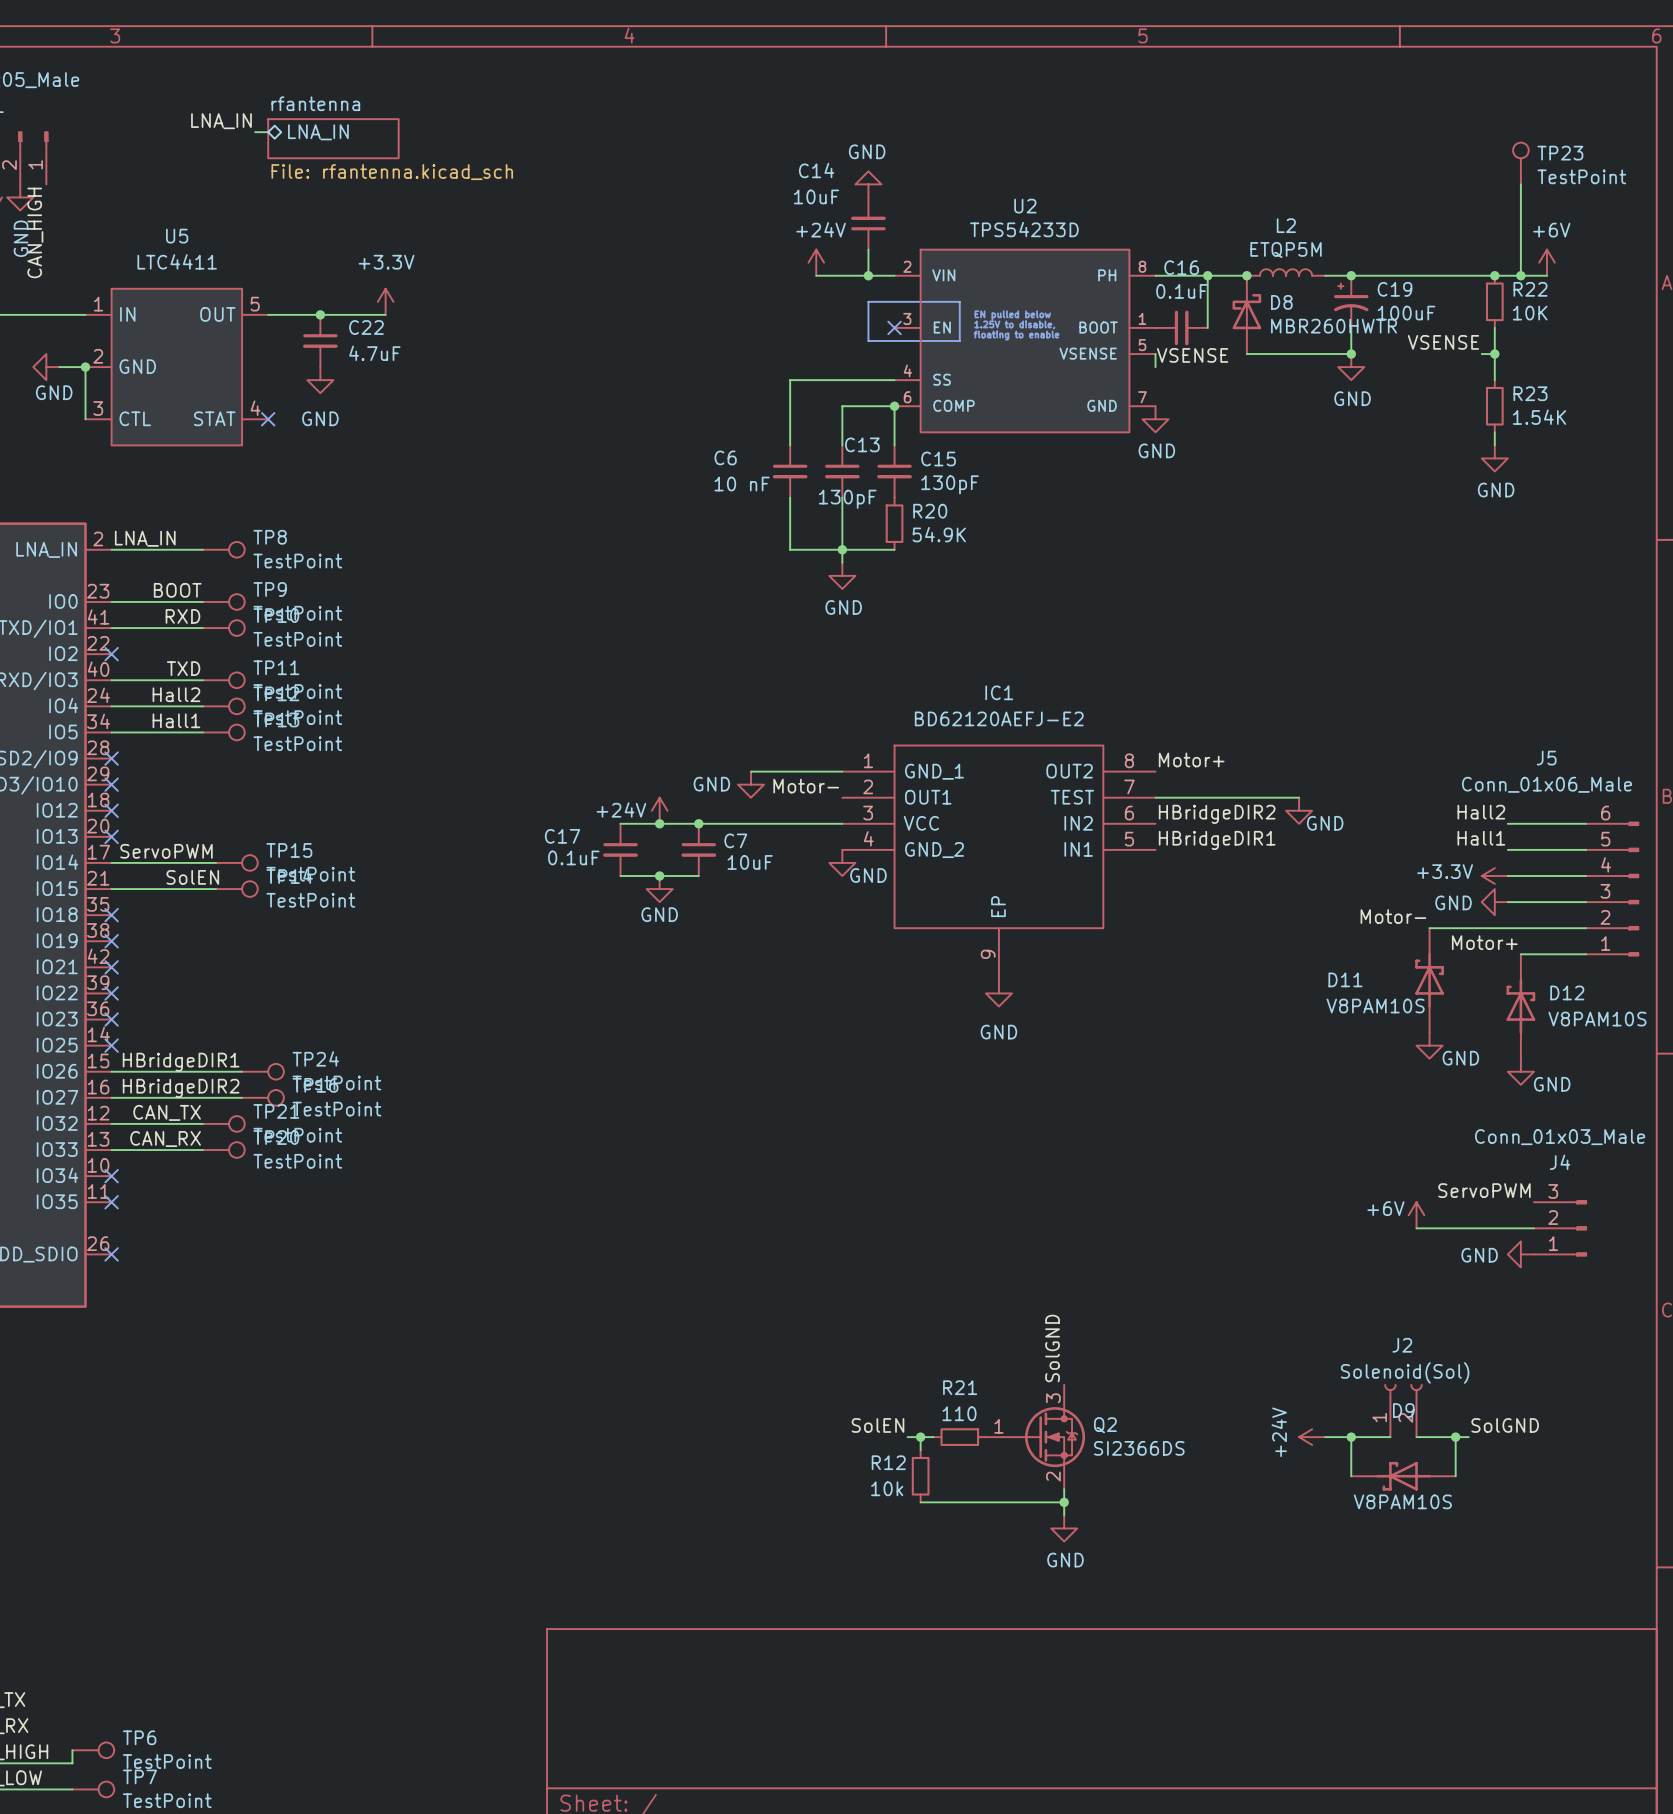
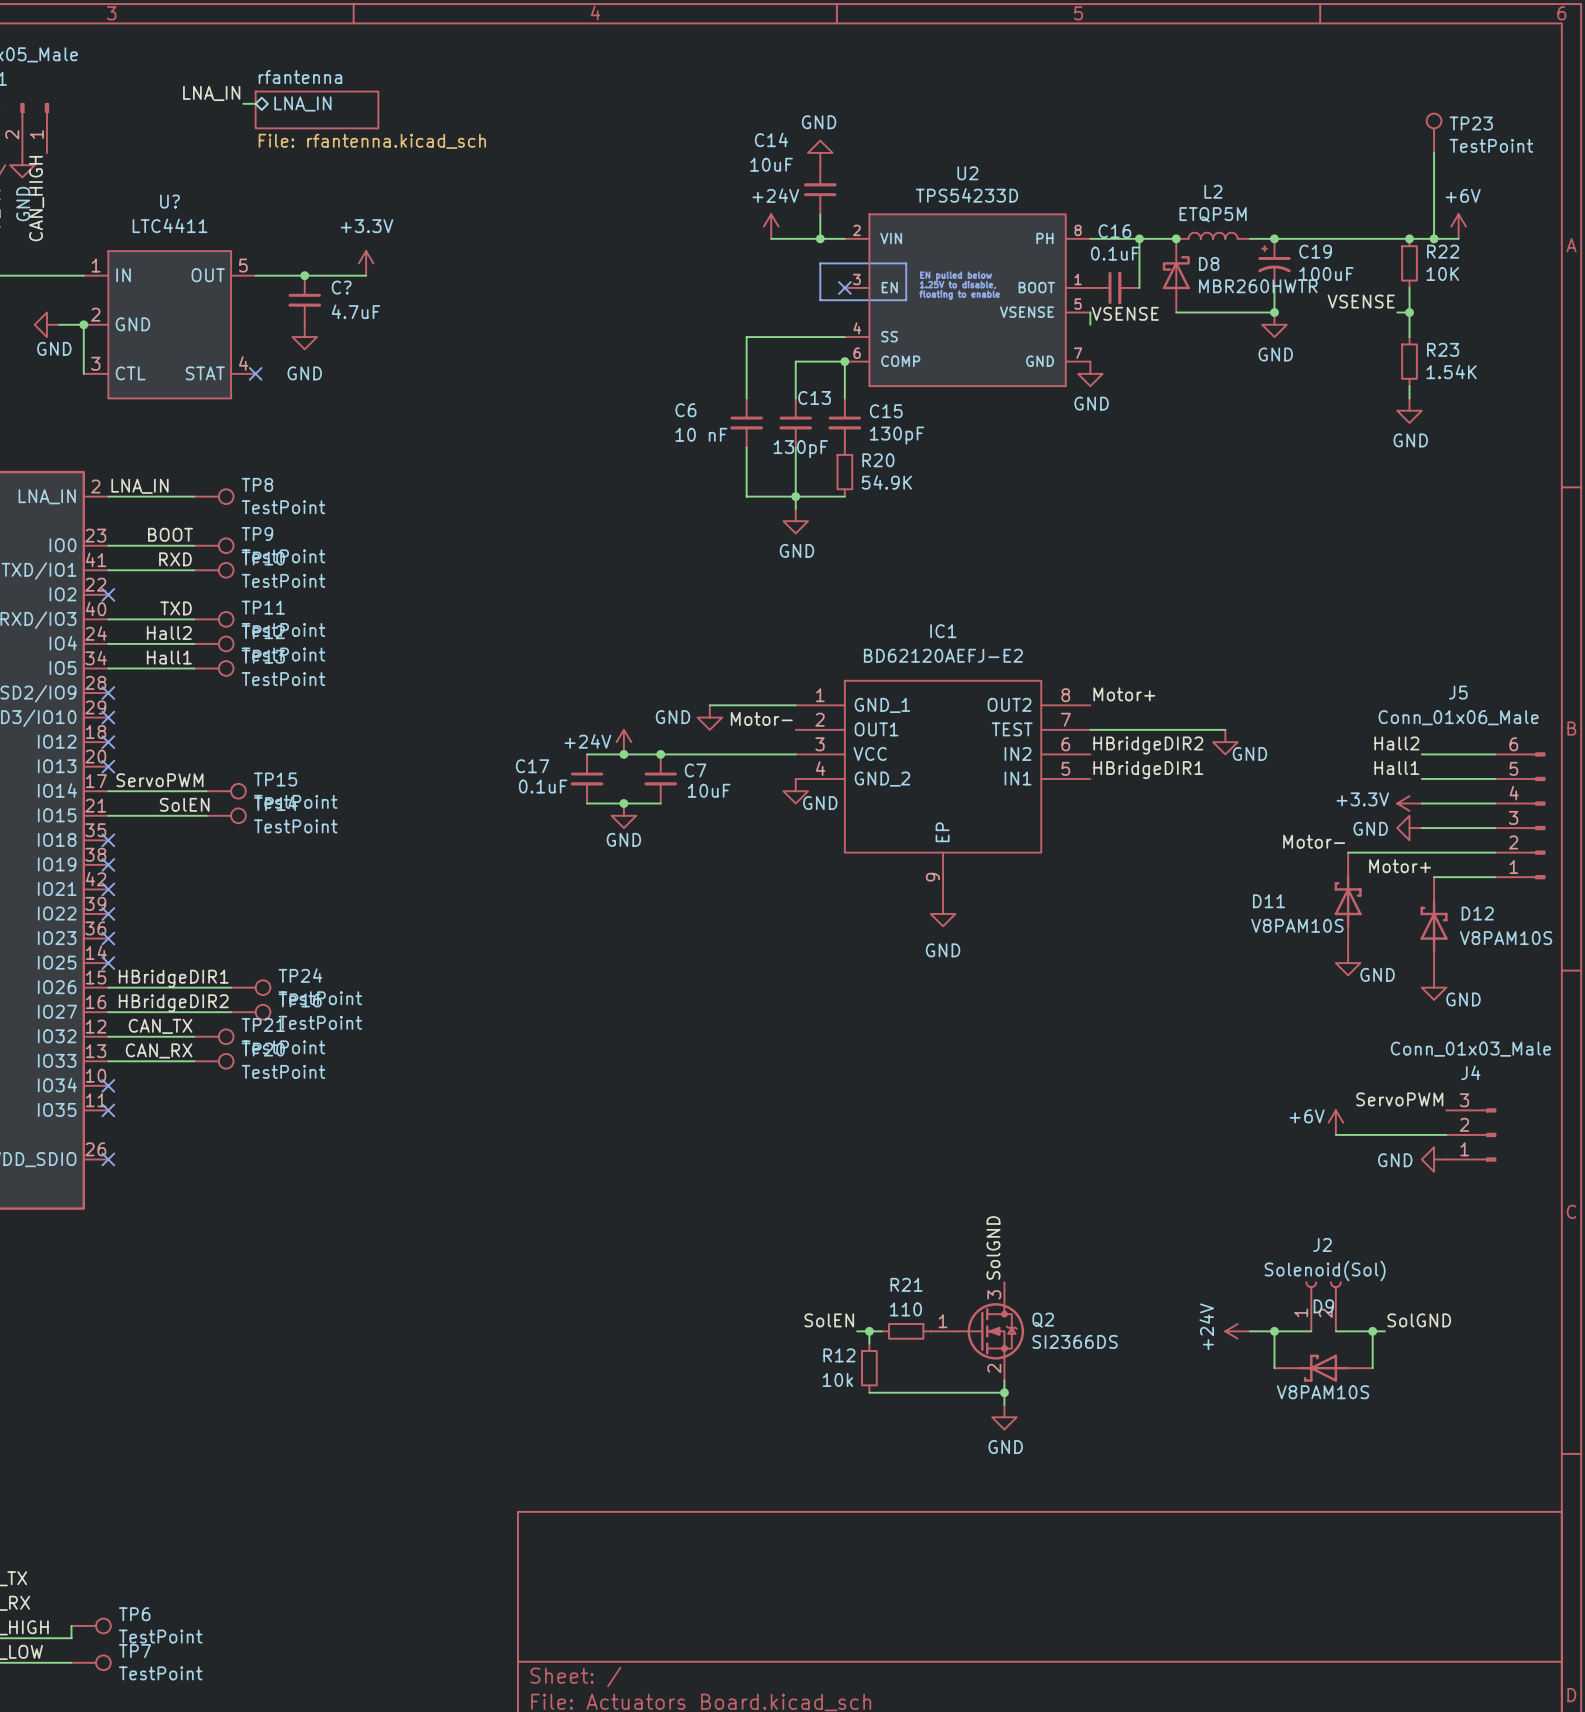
U5 name: U5 (177, 236) -> U? (170, 201)
C22 name: C22 (366, 327) -> C? (341, 287)

